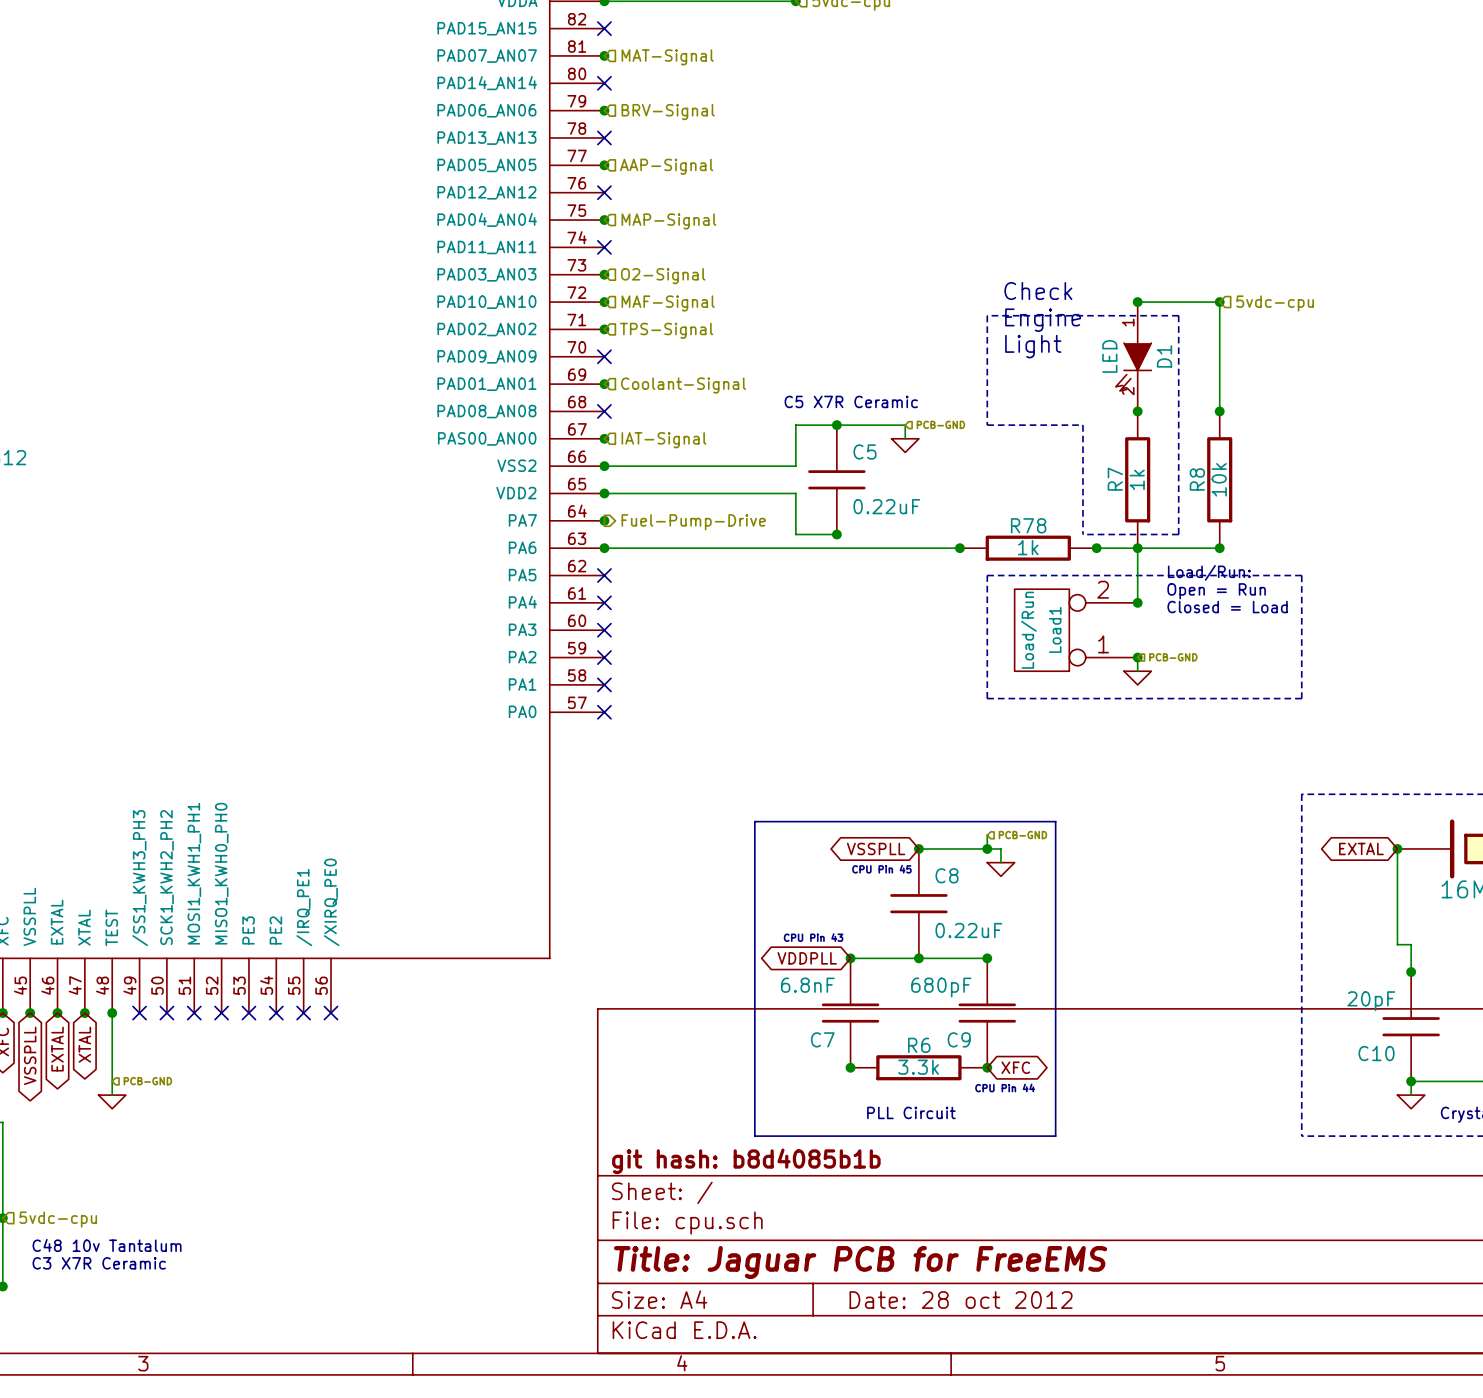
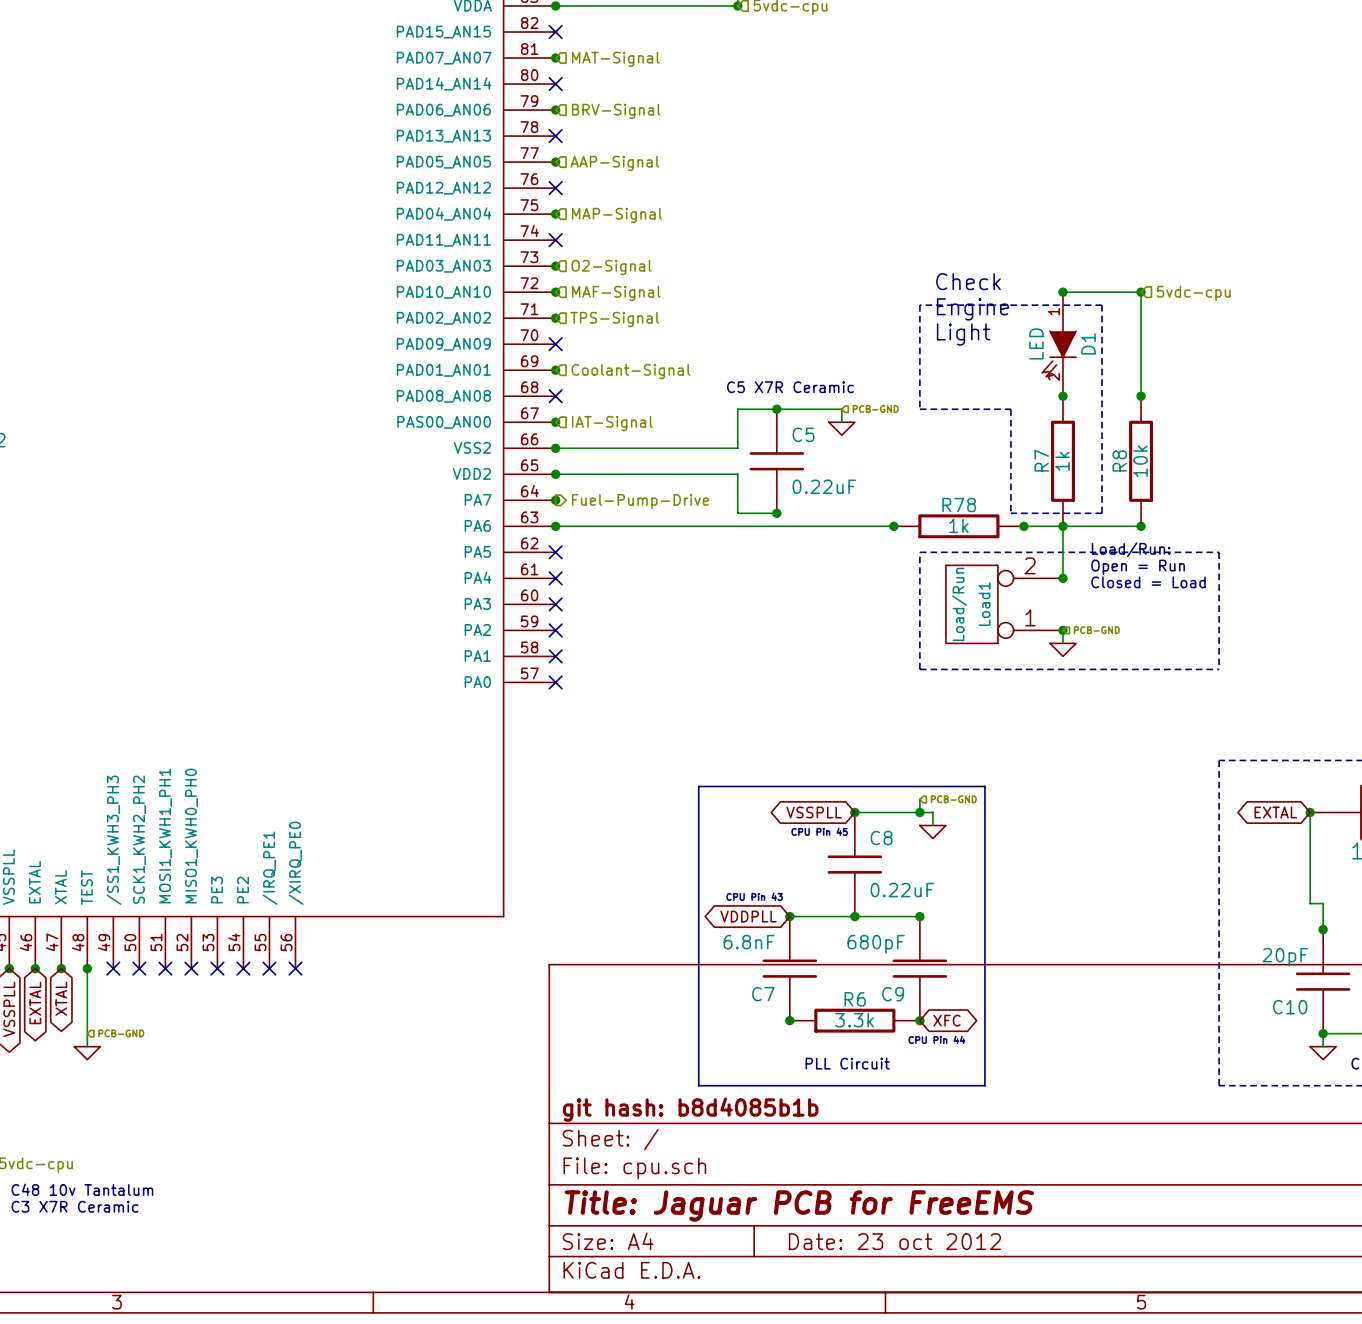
title block: Date: 28 oct 2012 (961, 1300) -> Date: 23 oct 2012 (894, 1241)

